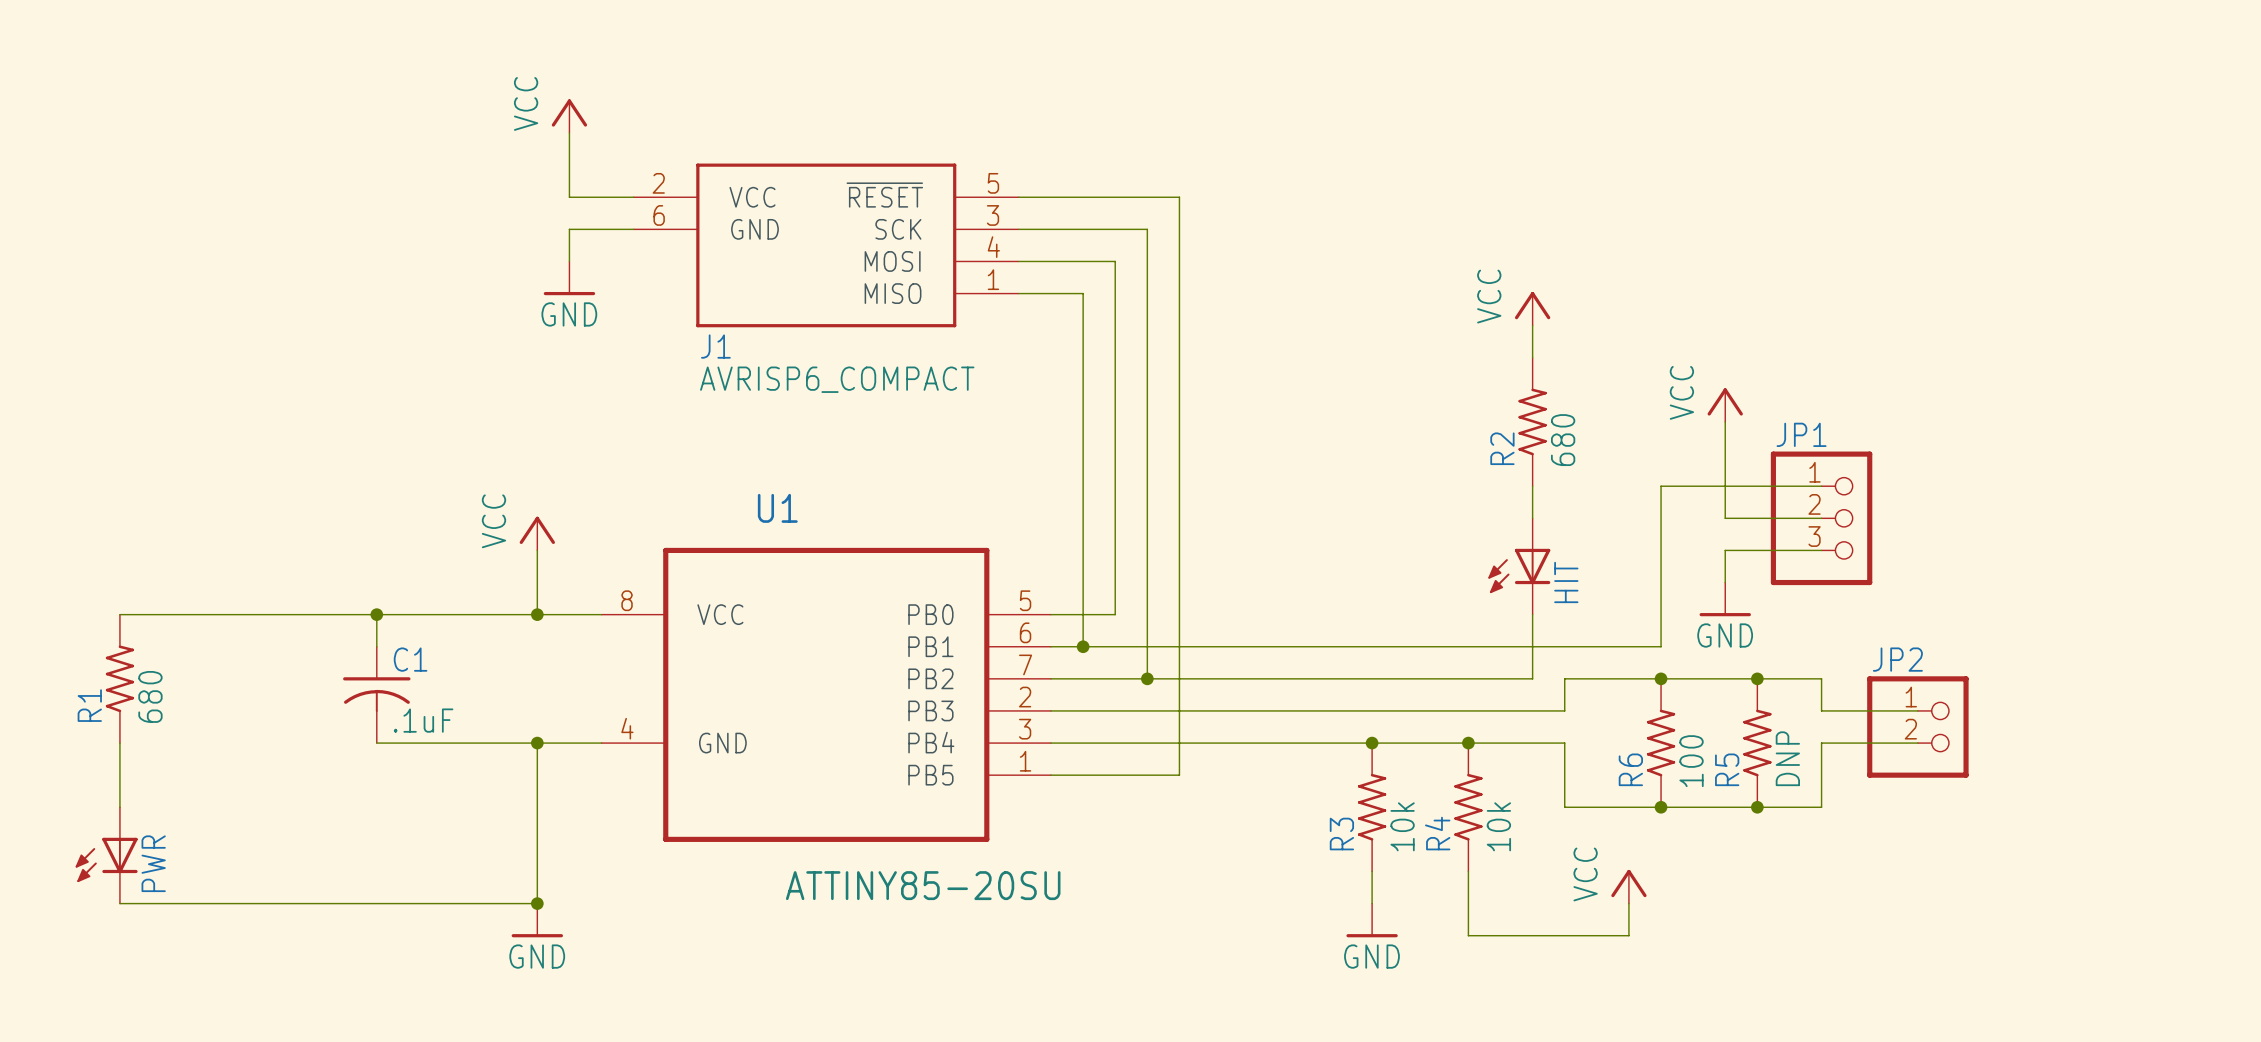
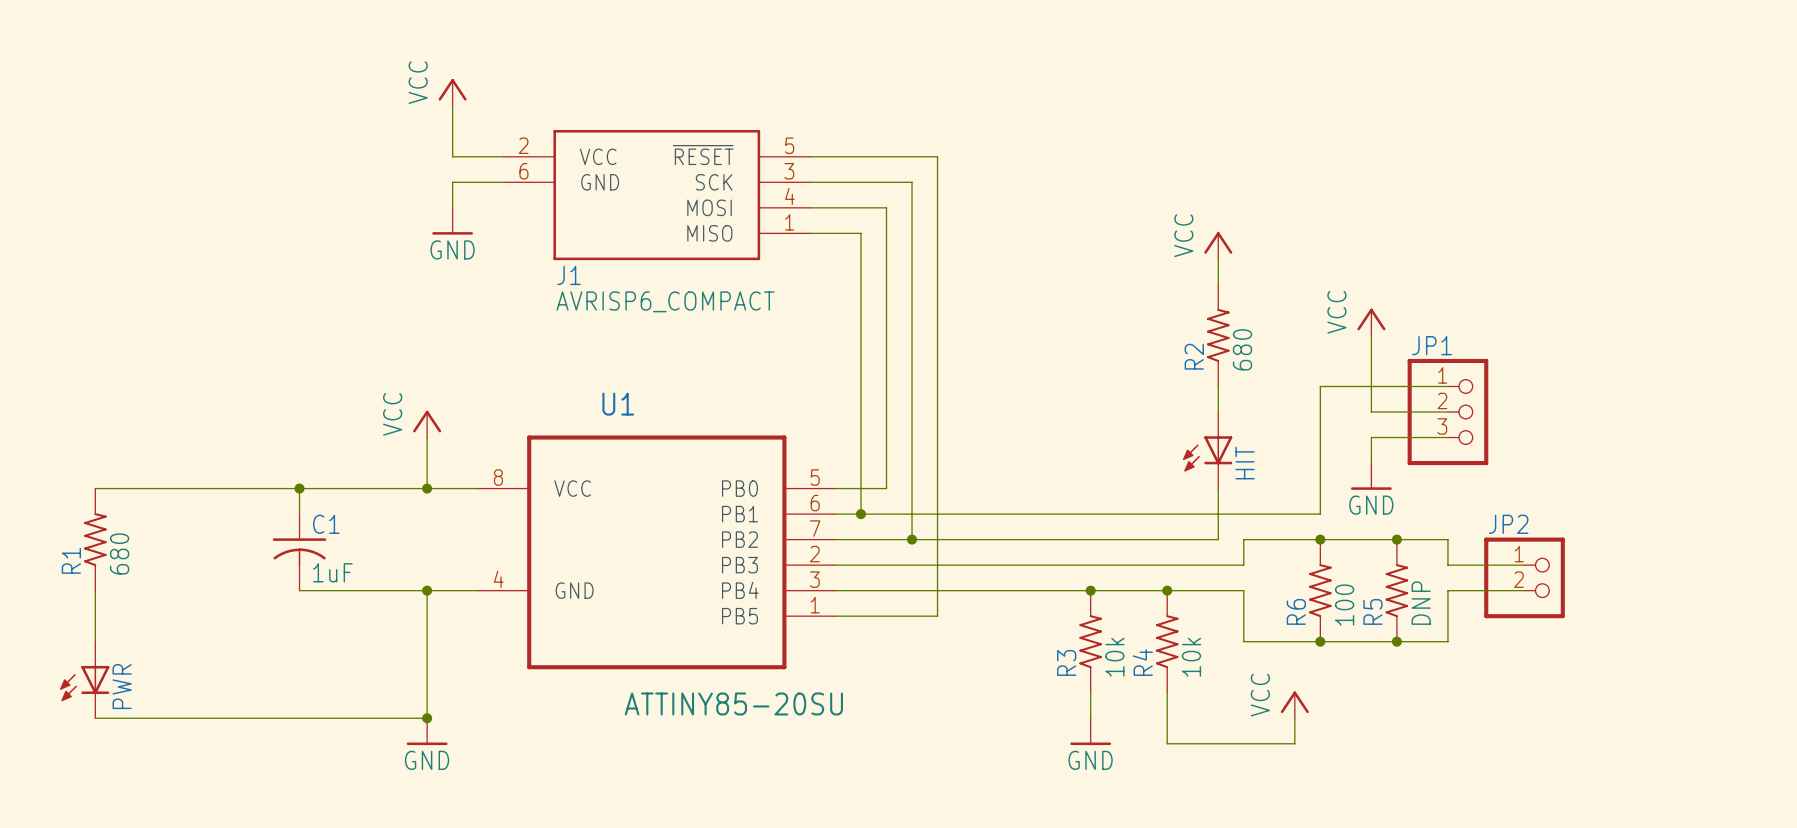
C1 value: .1uF (423, 720) -> 1uF (332, 572)

